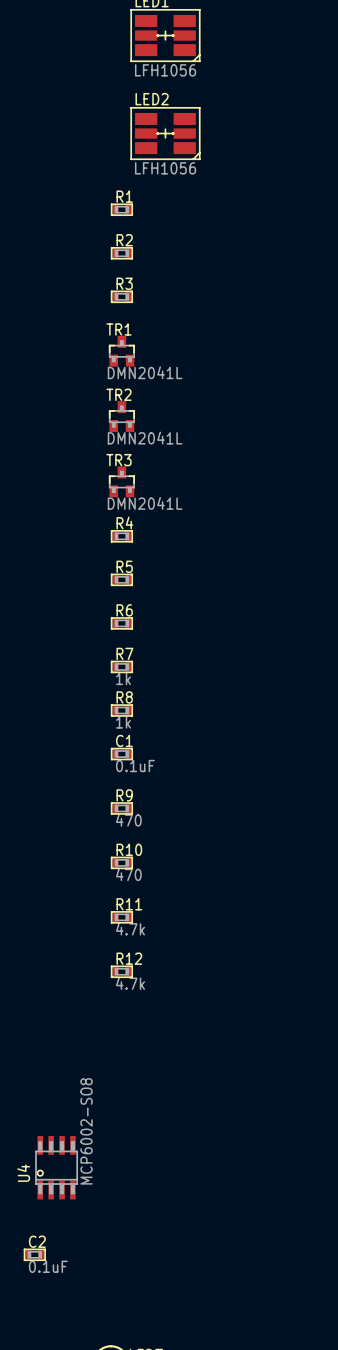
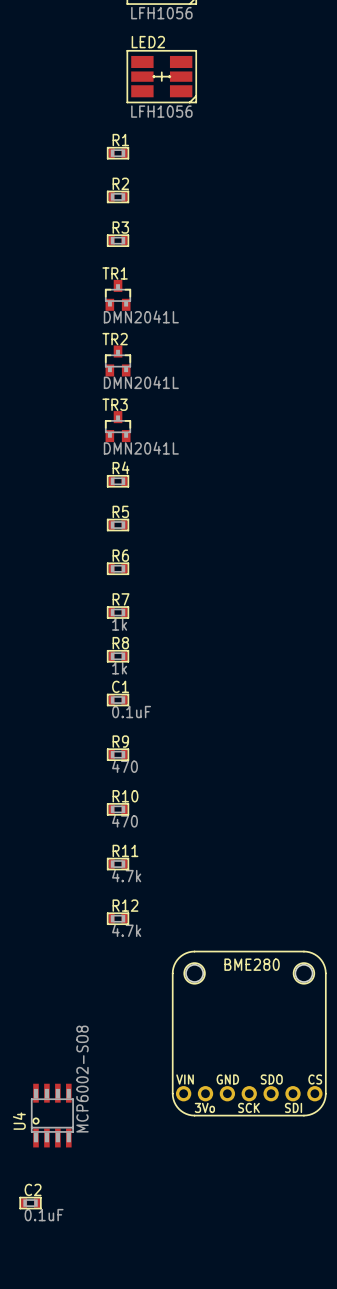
part: none -> (249, 1033)

